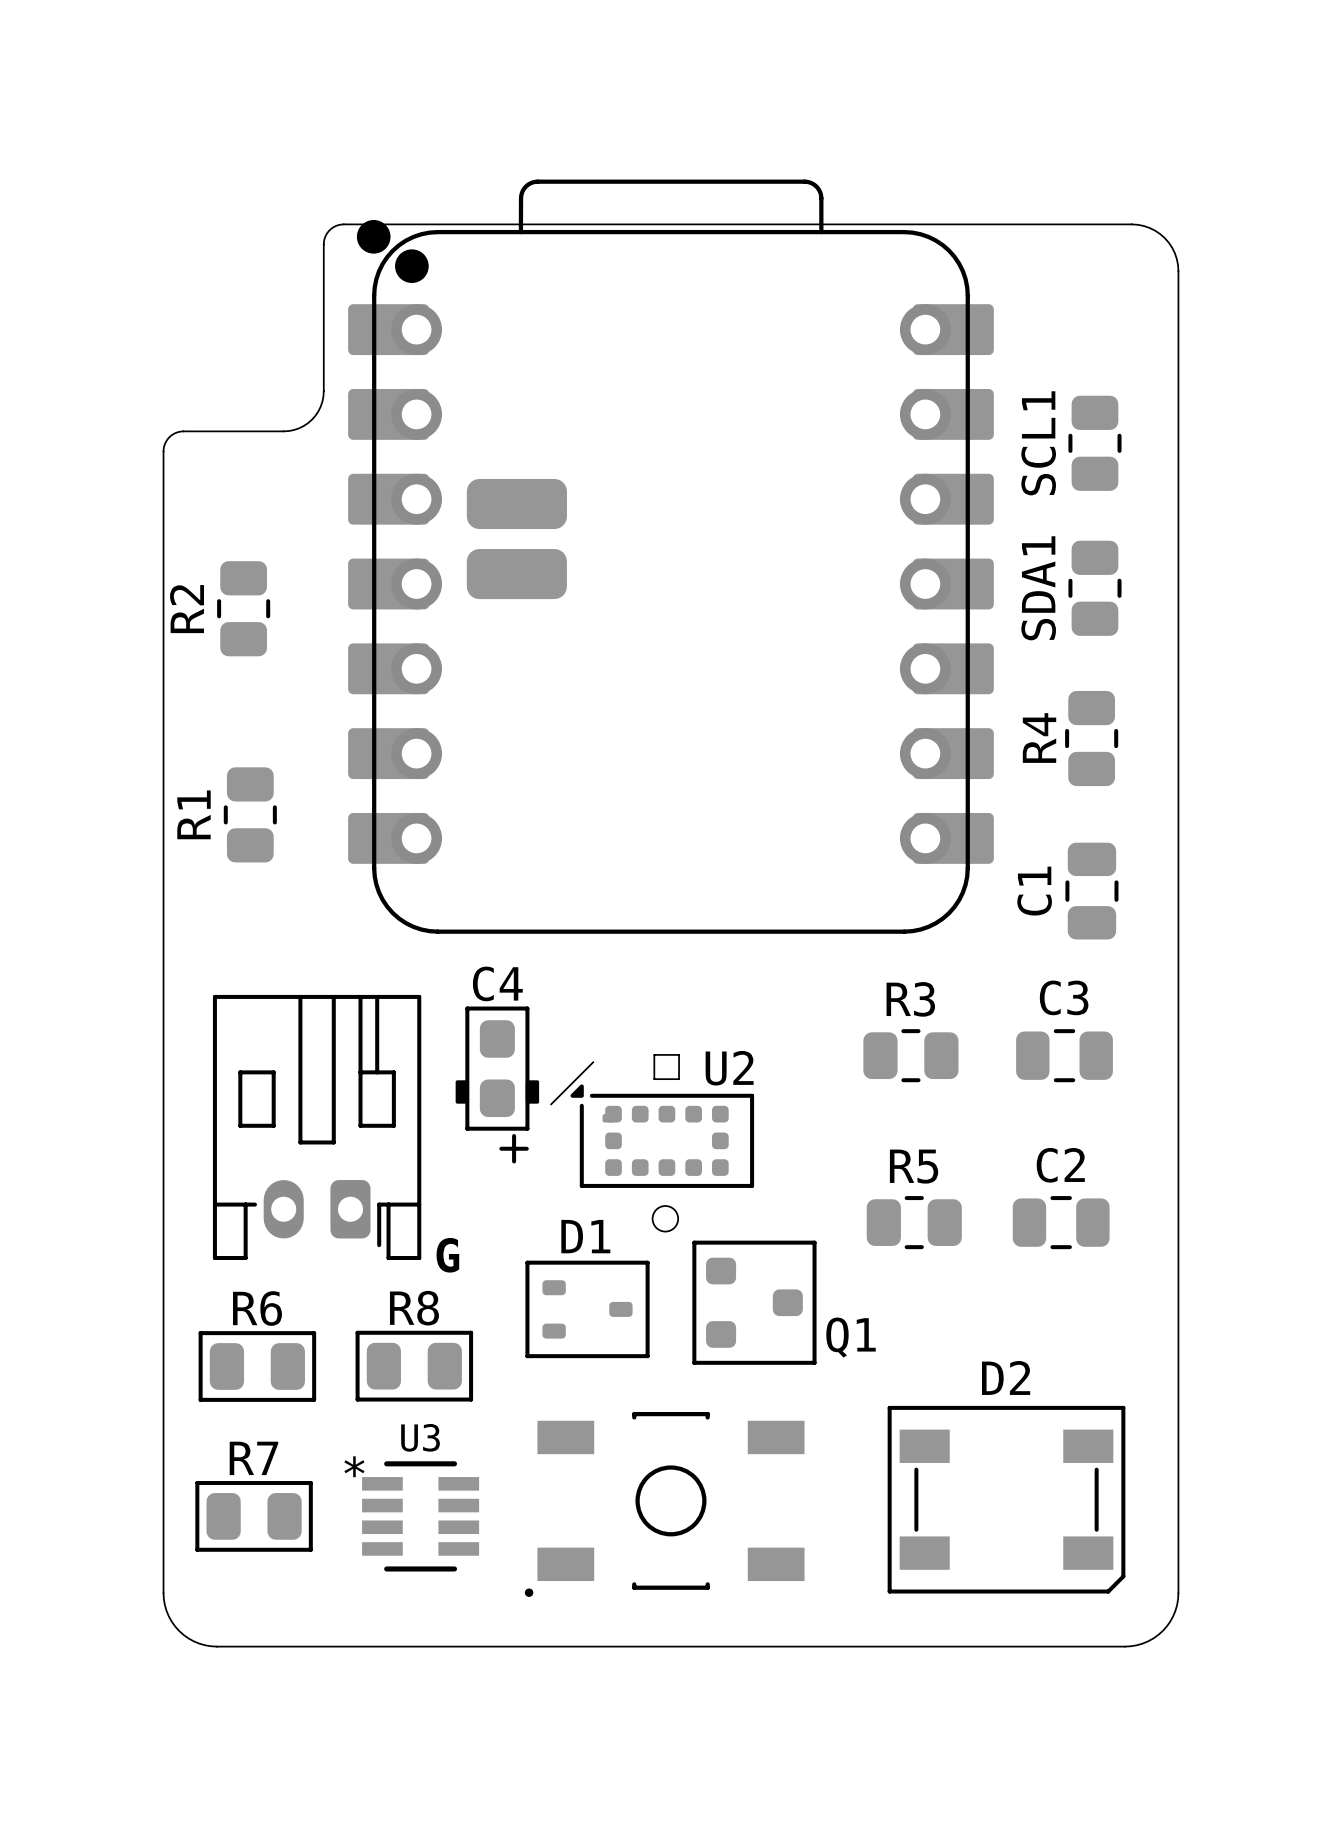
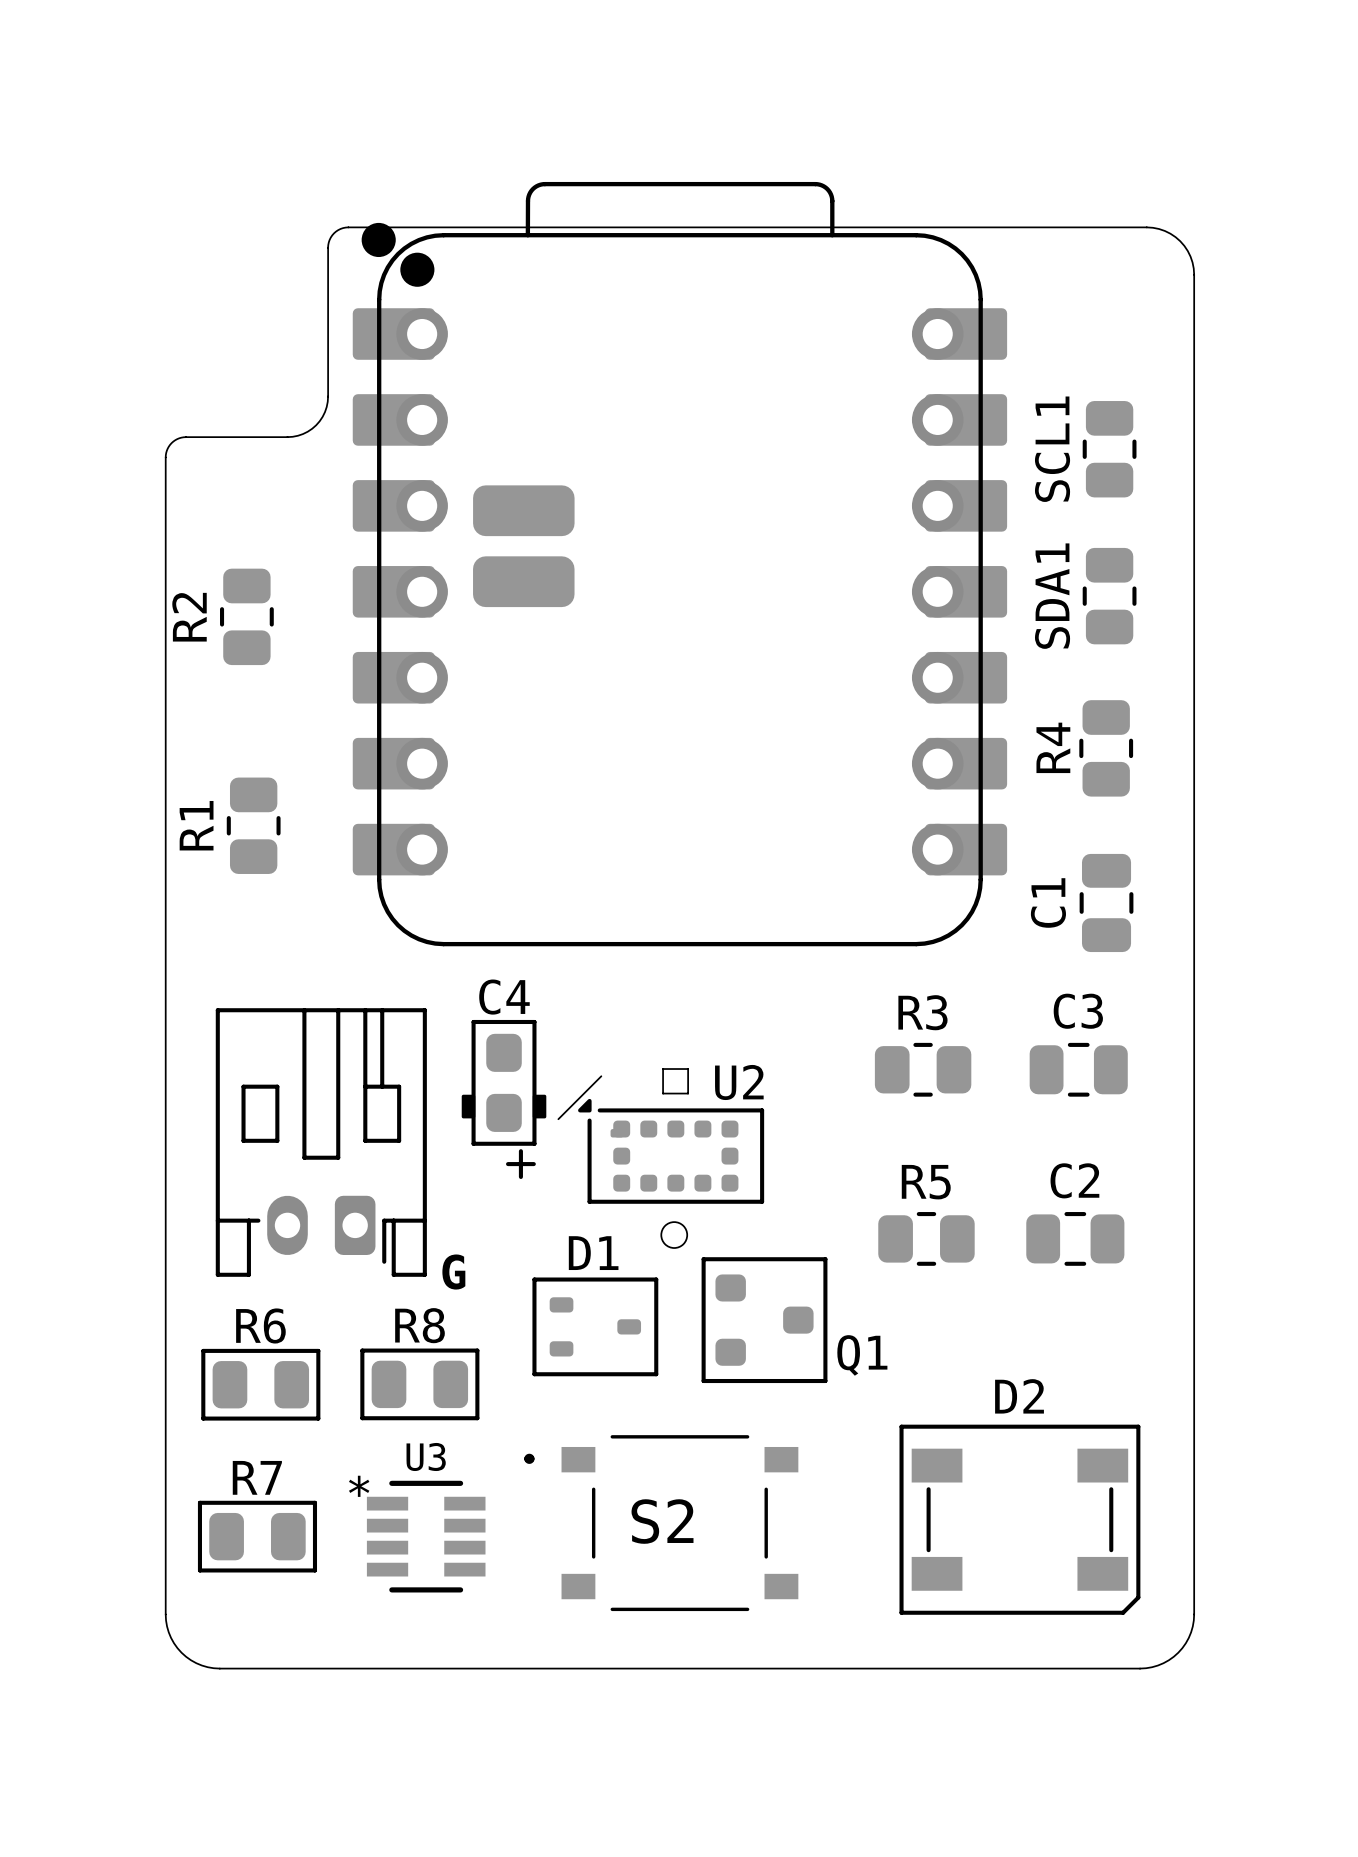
S2: none -> (661, 1523)
part: (664, 1504) -> none

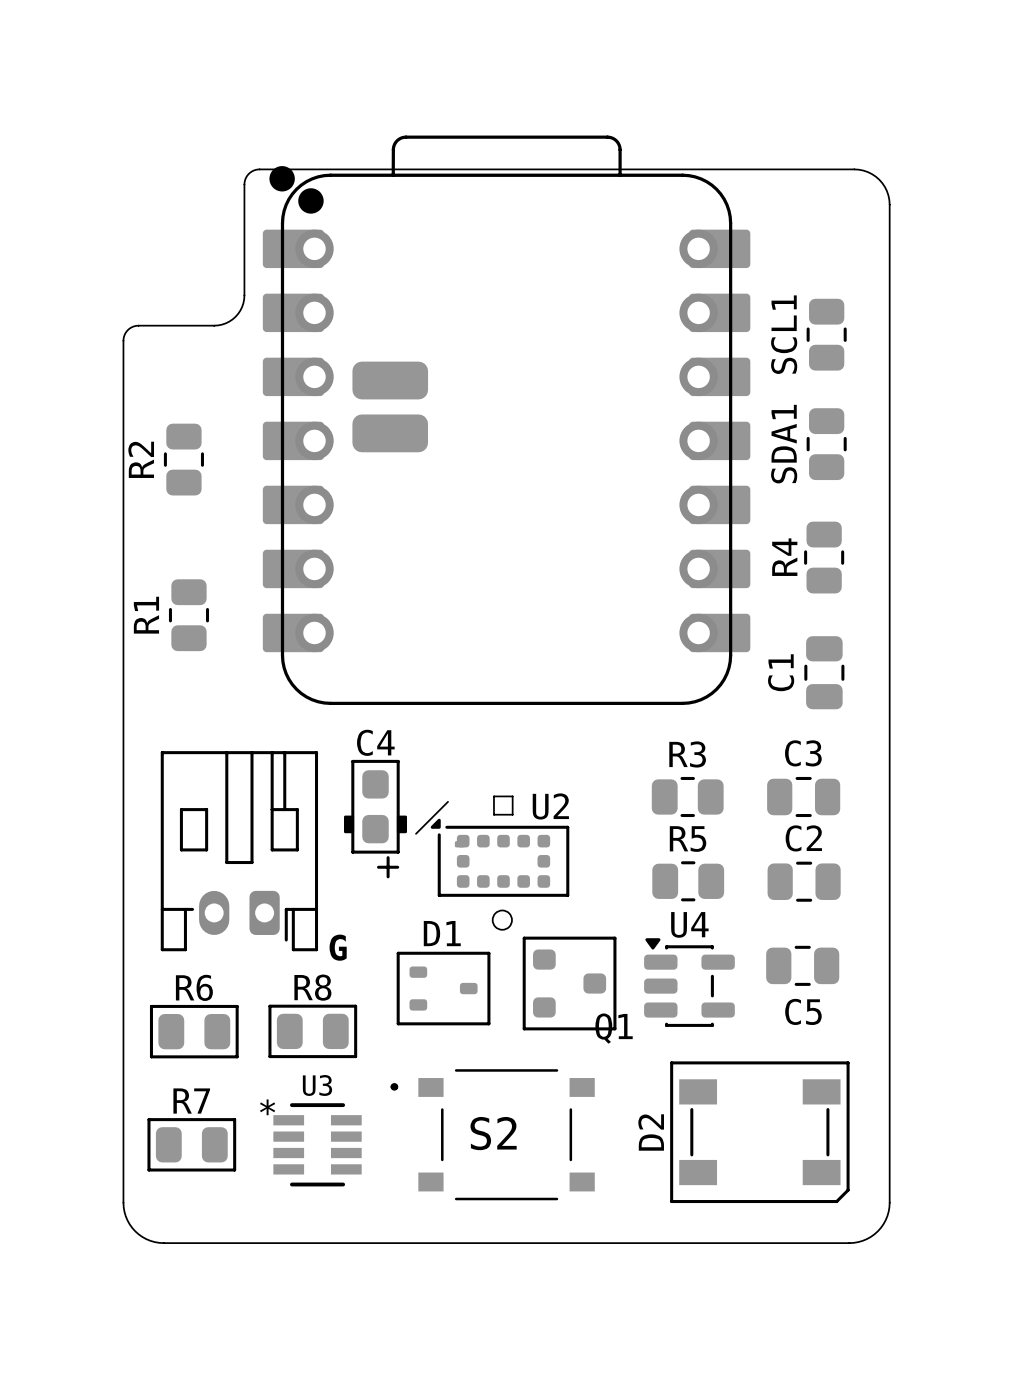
R5 position: (926, 1238) -> (688, 881)
C2 position: (1075, 1238) -> (804, 881)
C5: none -> (802, 965)
U4: none -> (689, 982)
Q1 name position: Q1 (862, 1355) -> Q1 (614, 1028)
D2 name rotation: 0° (1019, 1396) -> 90° counterclockwise (651, 1132)
D2 name position: D2 (1019, 1396) -> D2 (651, 1132)

